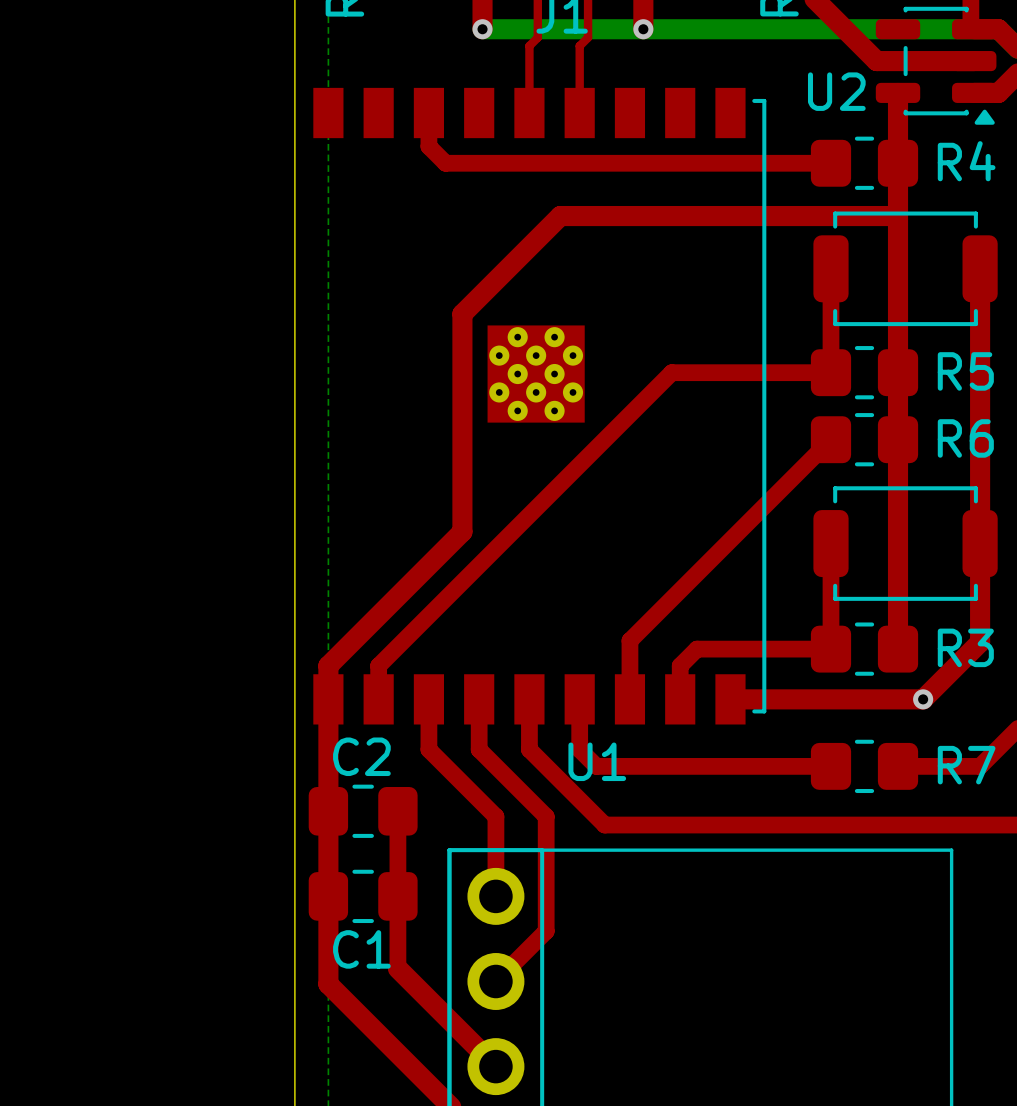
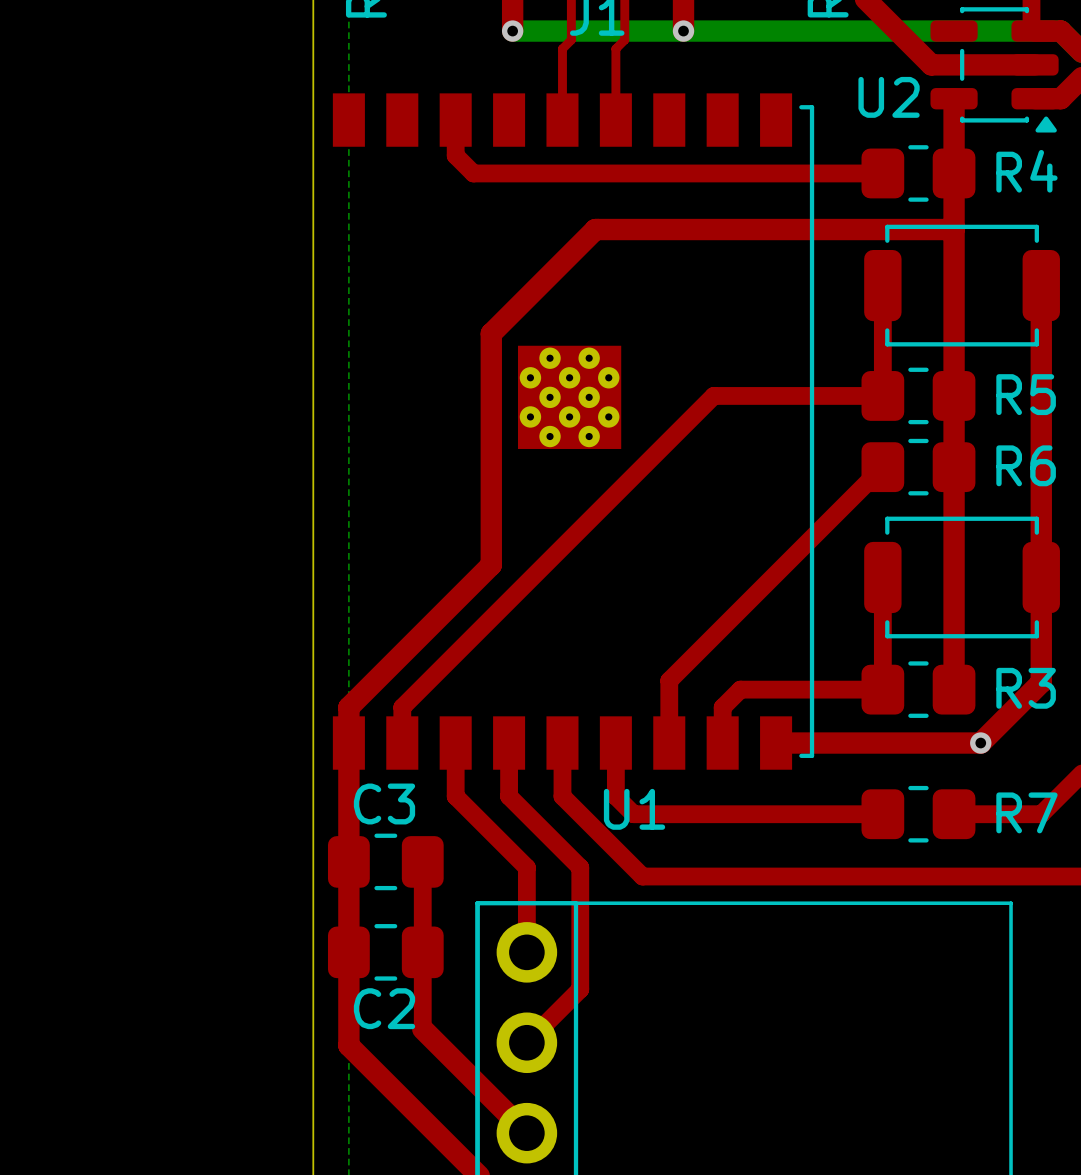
C2 name: C2 (361, 756) -> C3 (384, 803)
C1 name: C1 (361, 949) -> C2 (384, 1008)

